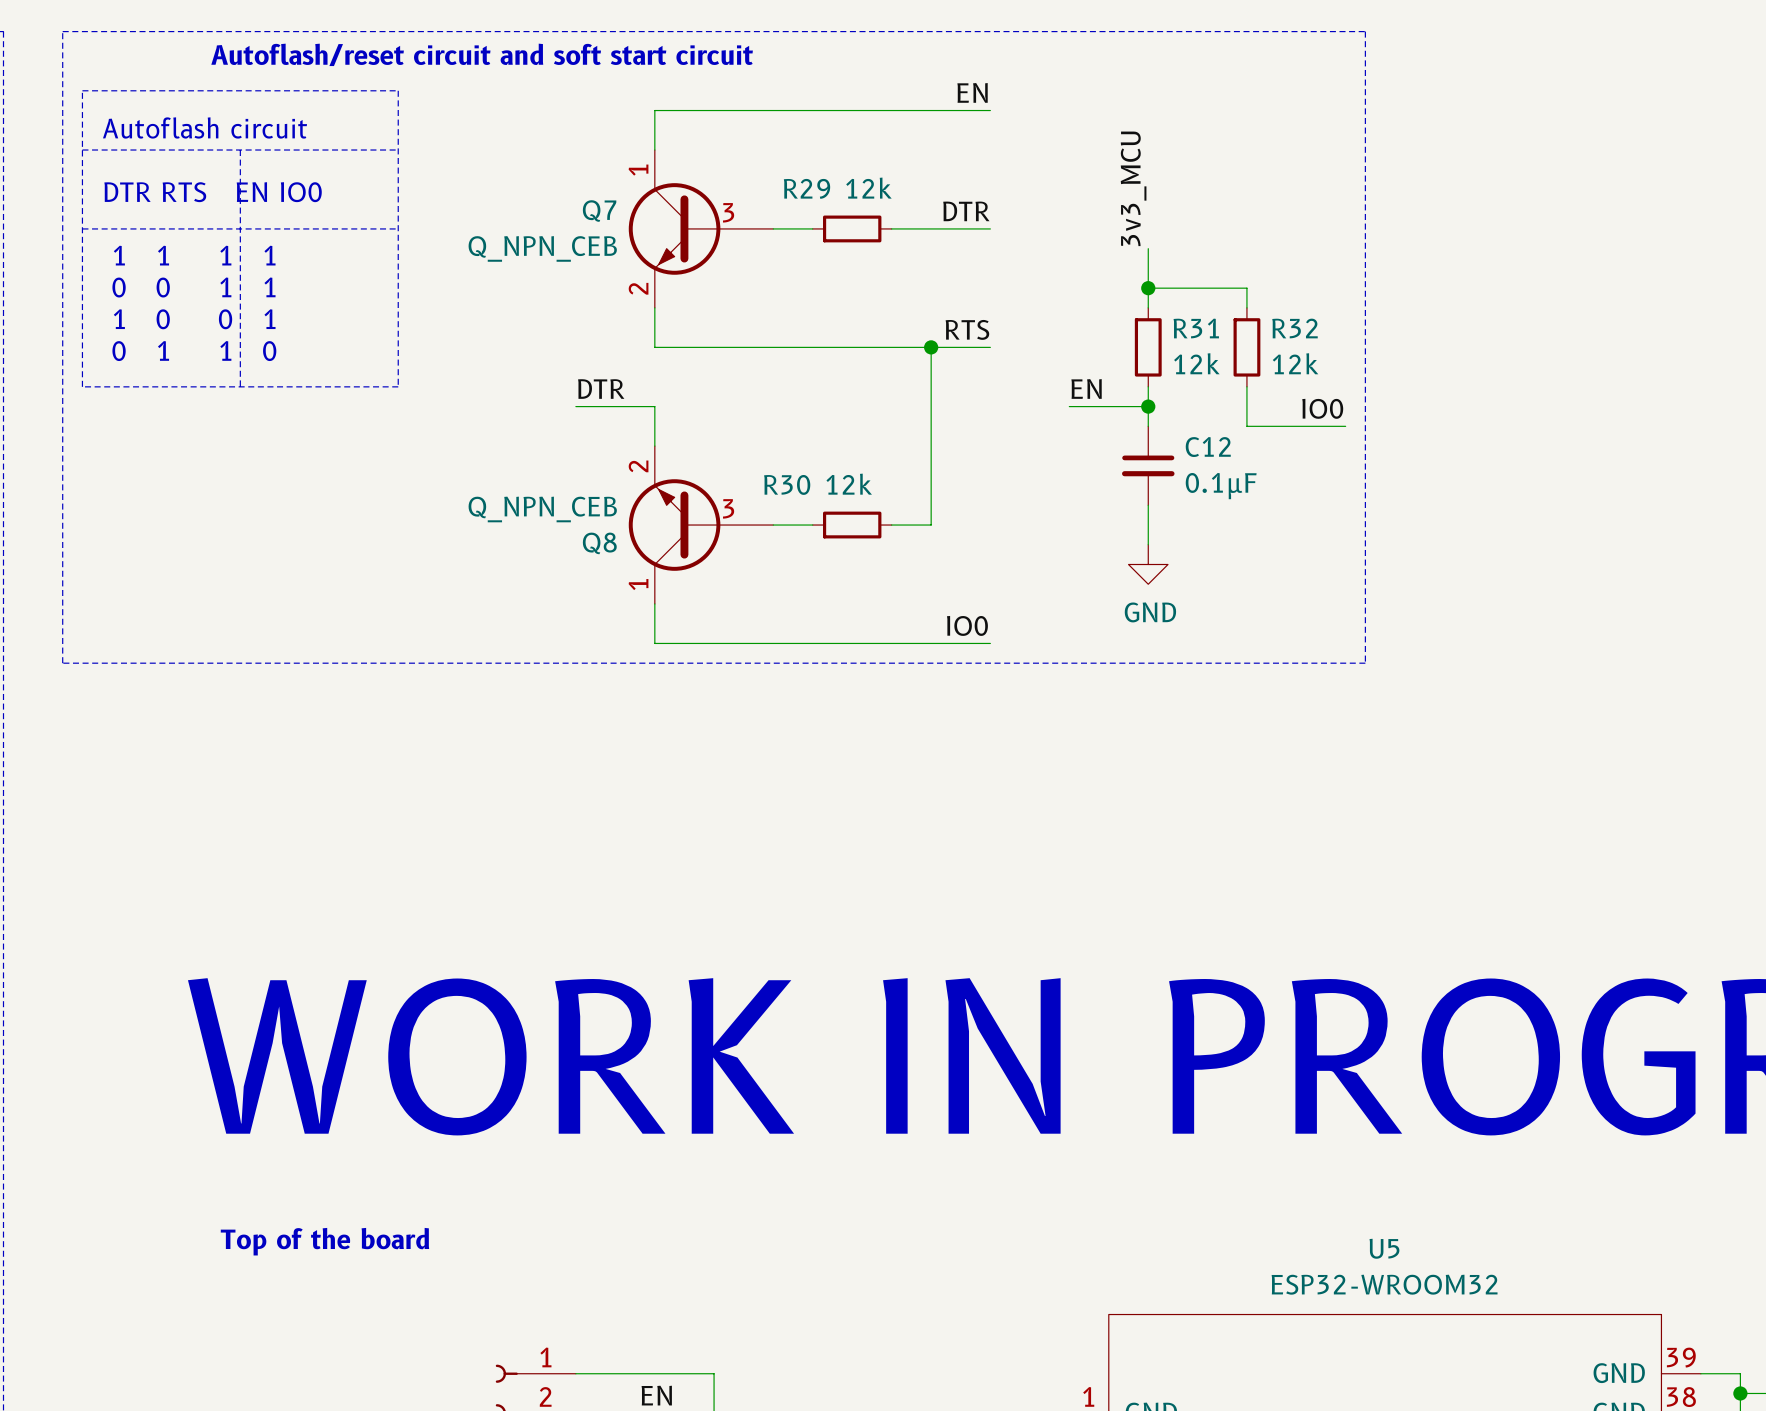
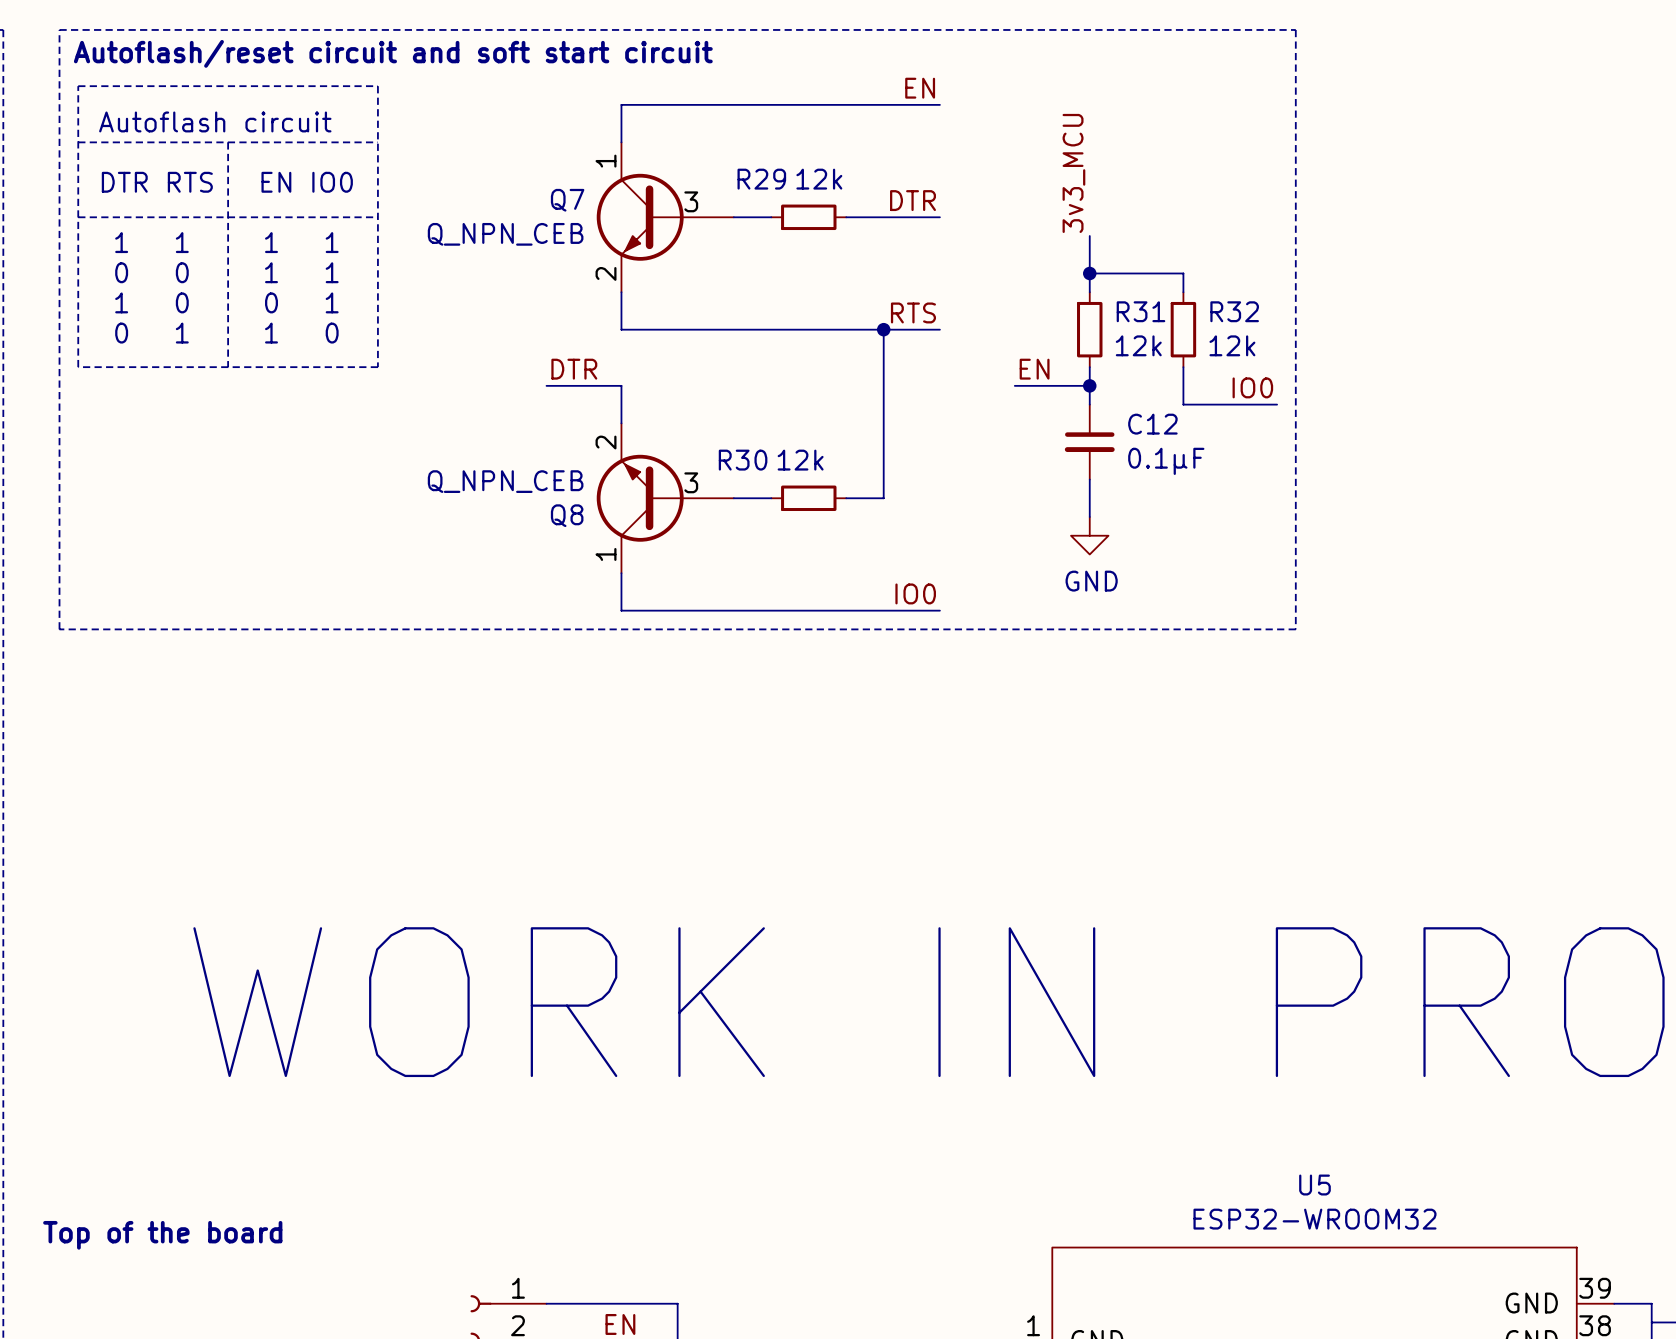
text position: Top of the board (324, 1241) -> Top of the board (162, 1235)
junction: (1740, 1393) -> none

